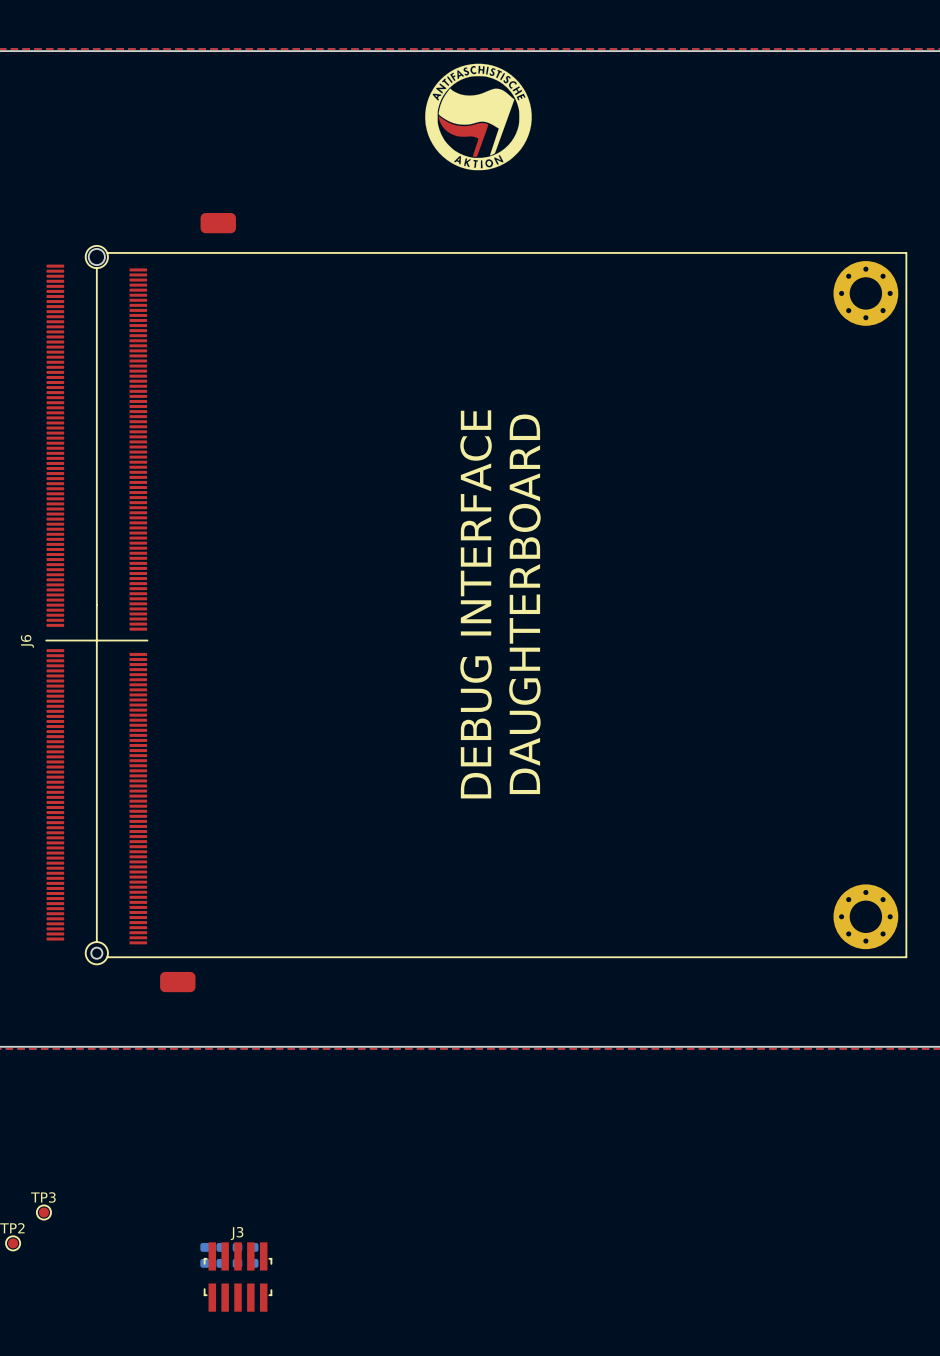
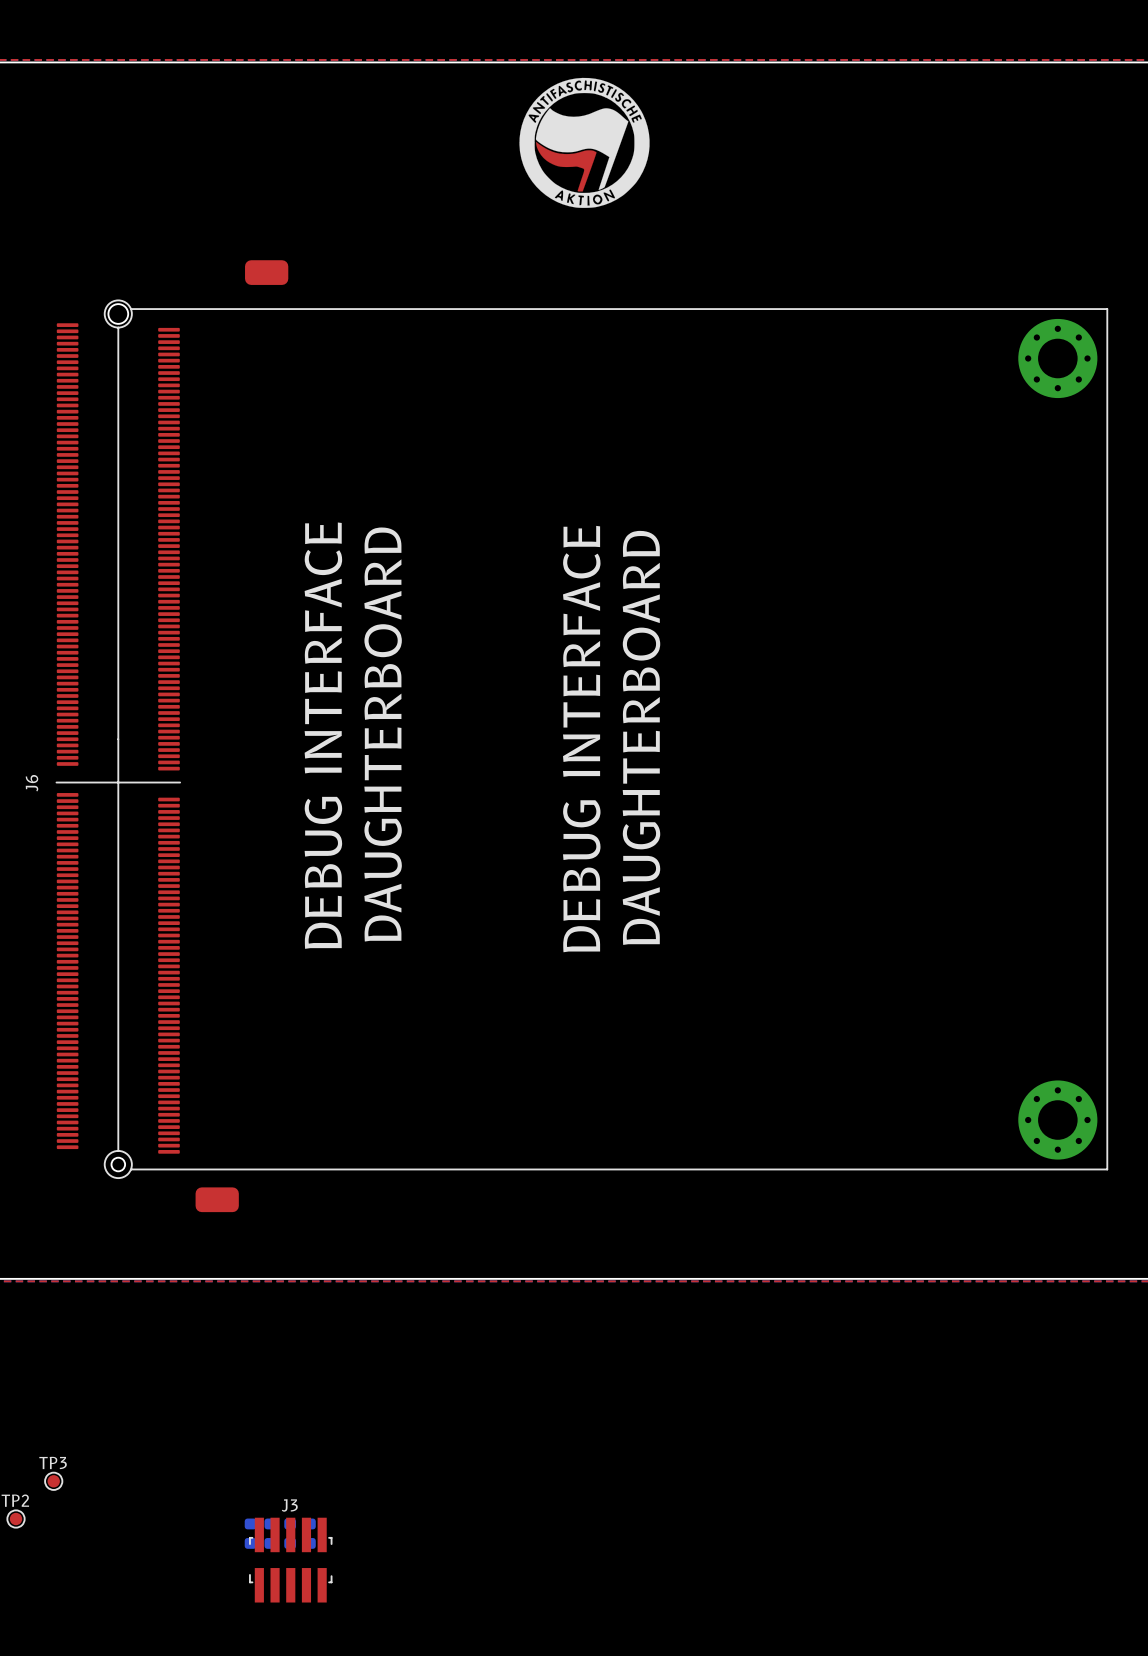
text: none -> DEBUG INTERFACE (323, 735)
text: none -> DAUGHTERBOARD (383, 734)

